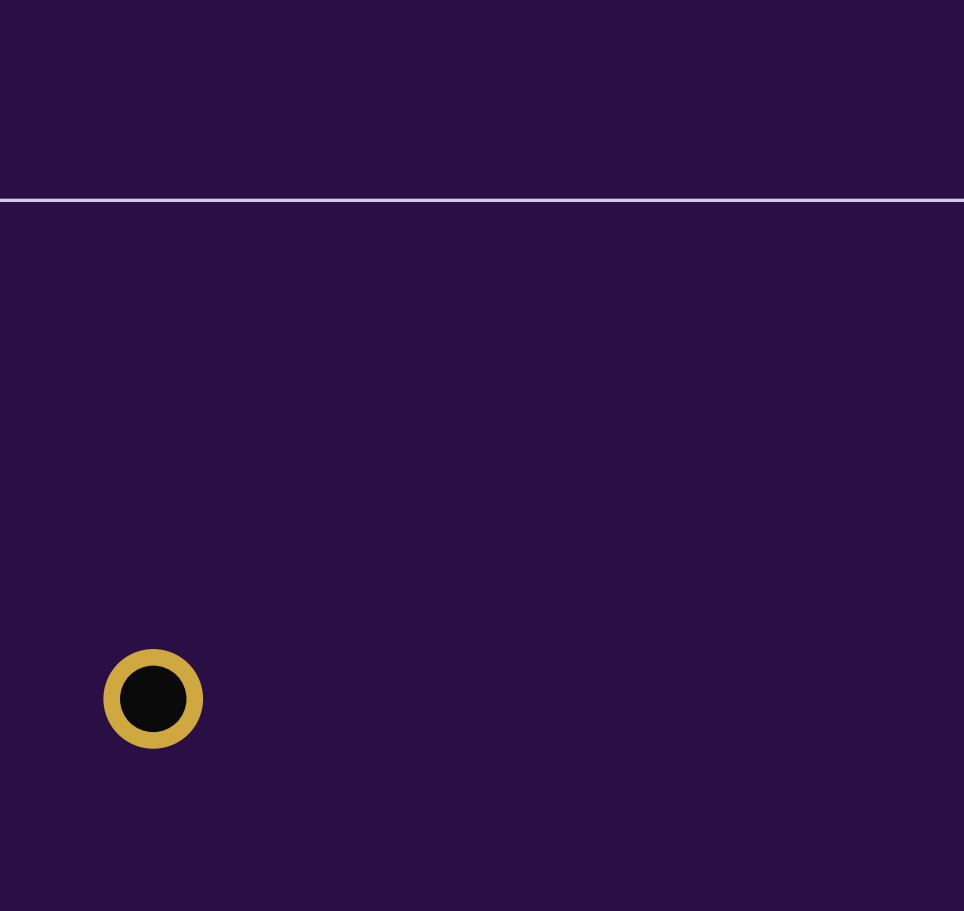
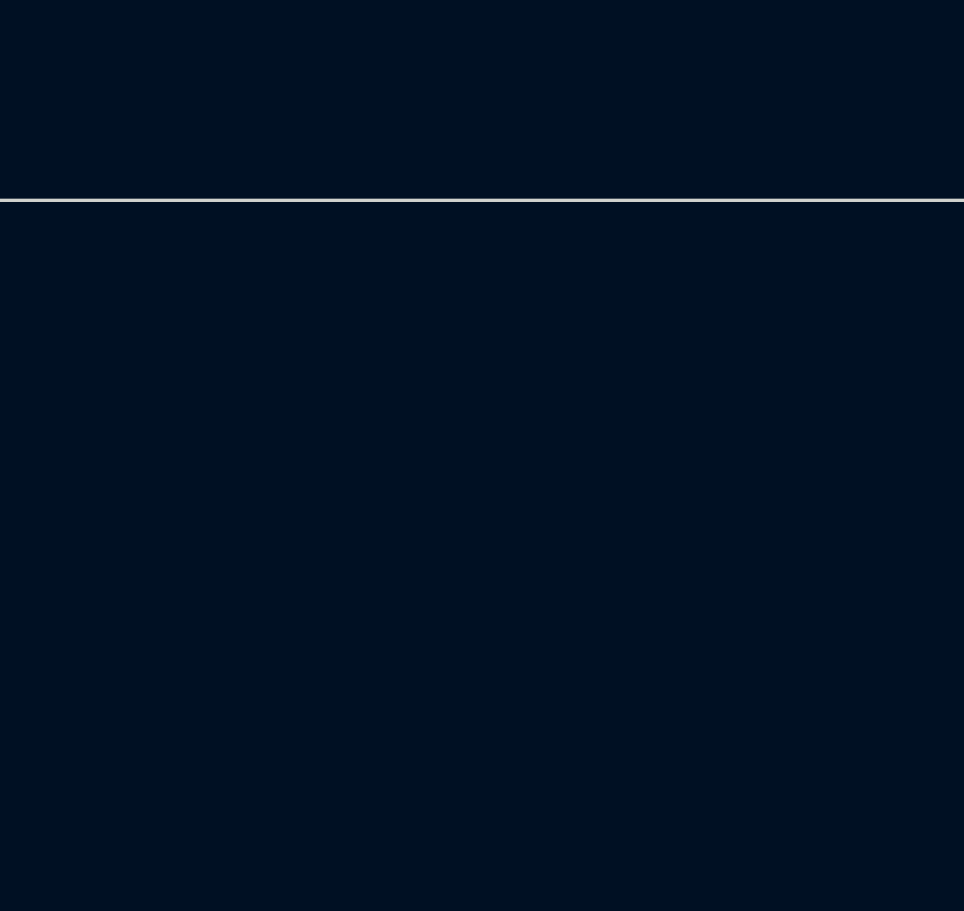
via: (153, 698) -> none

